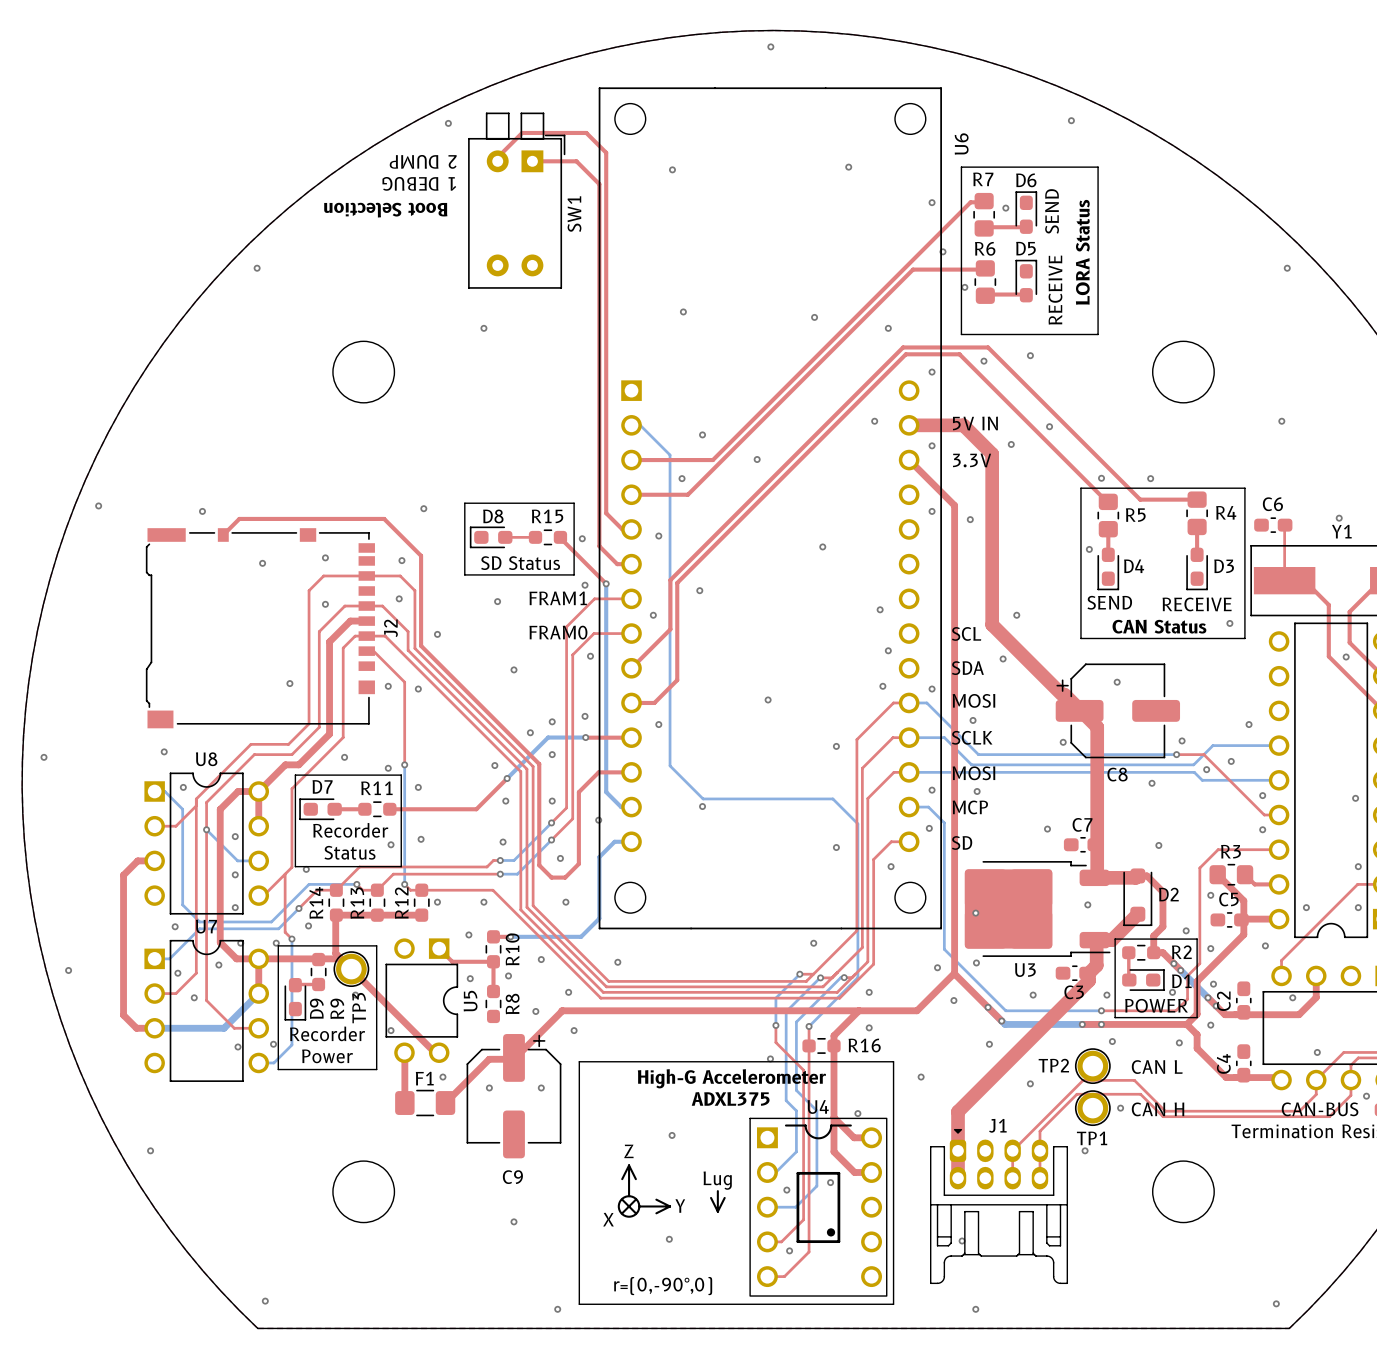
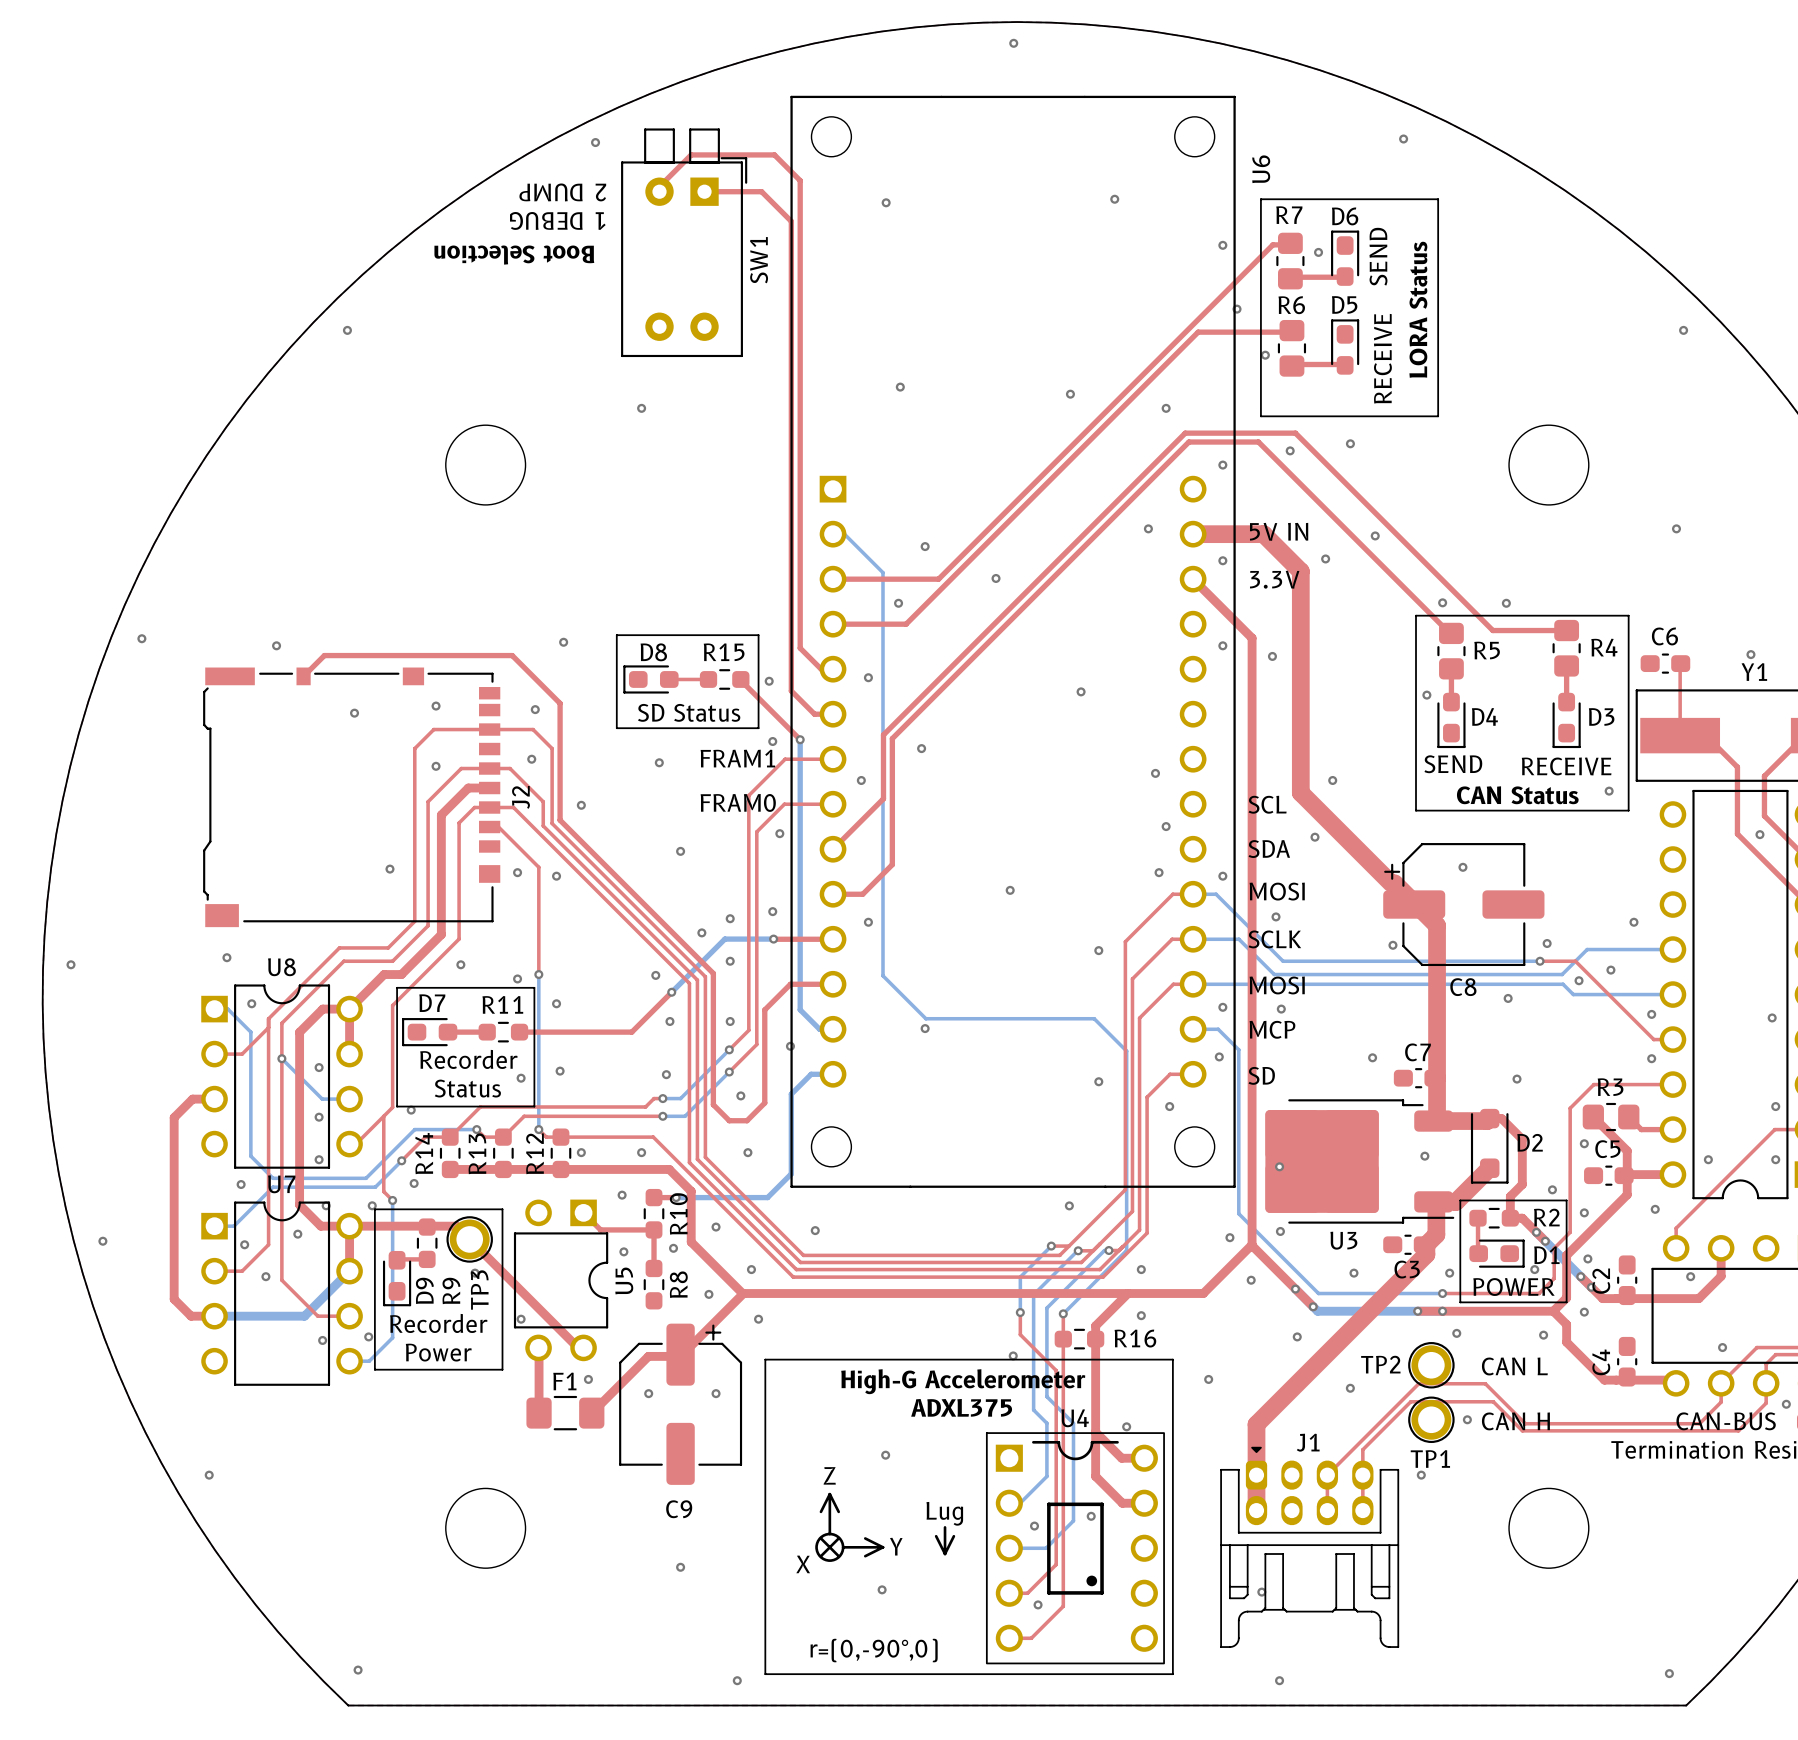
top track: (336, 915) (335, 953) (341, 958) -> none
top track: none -> (560, 1169) (669, 1169) (691, 1191) (691, 1242) (742, 1293)

